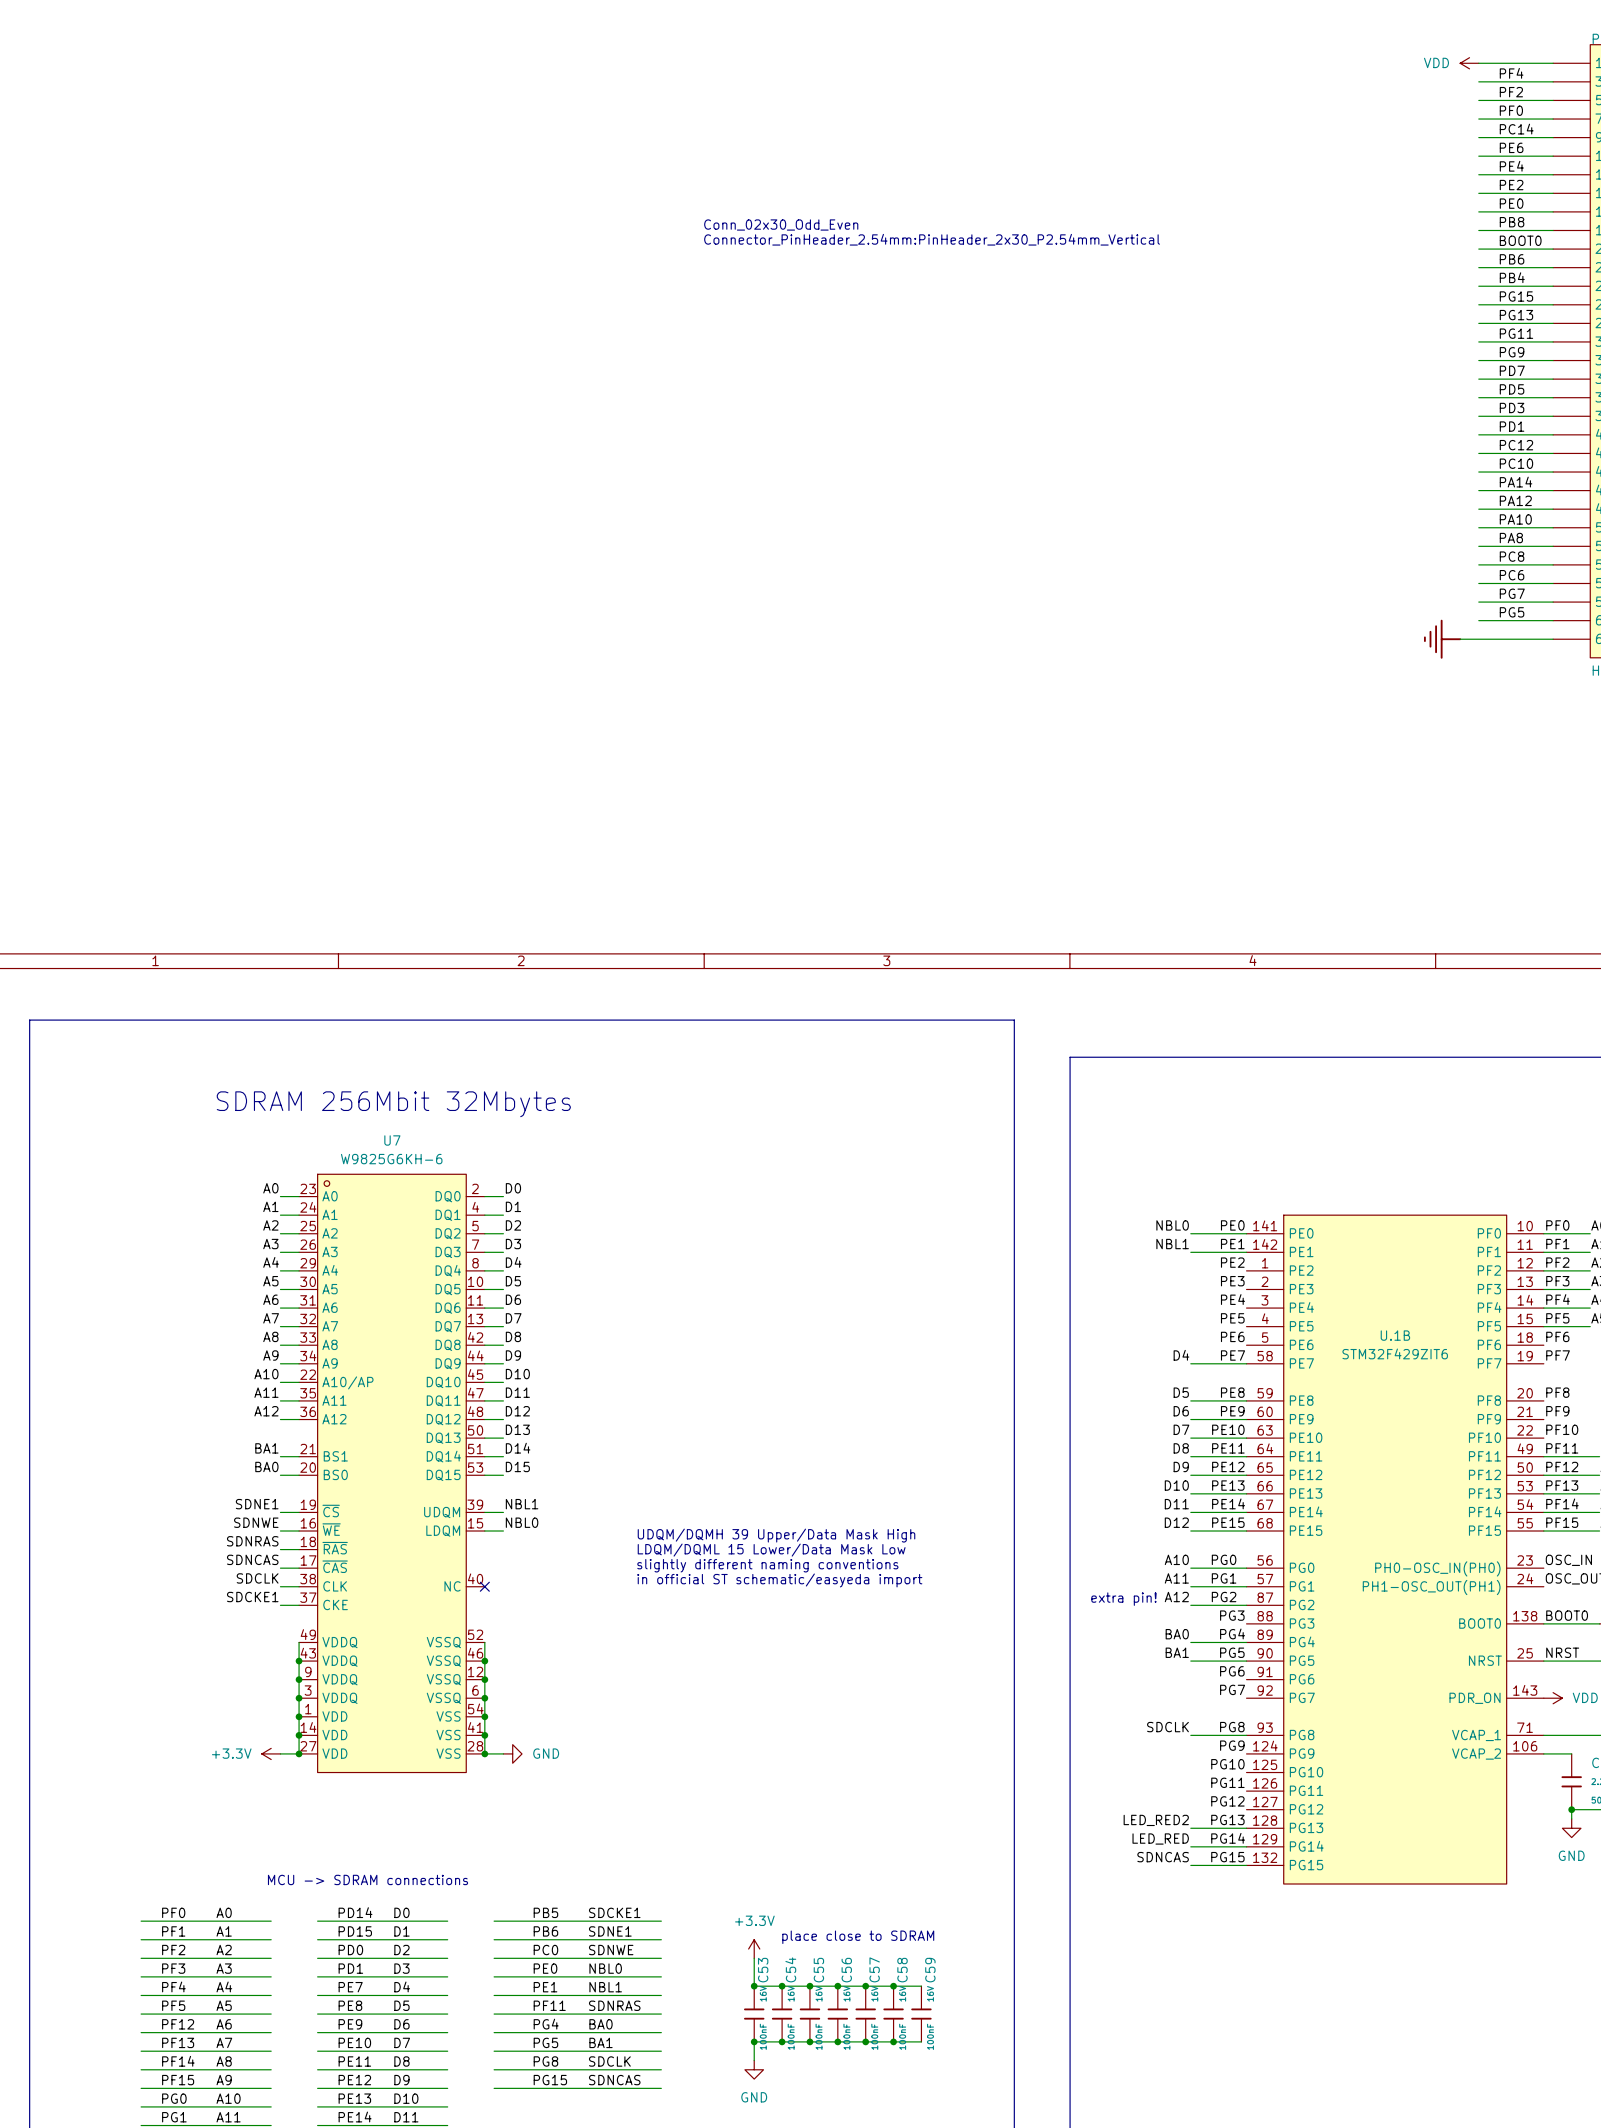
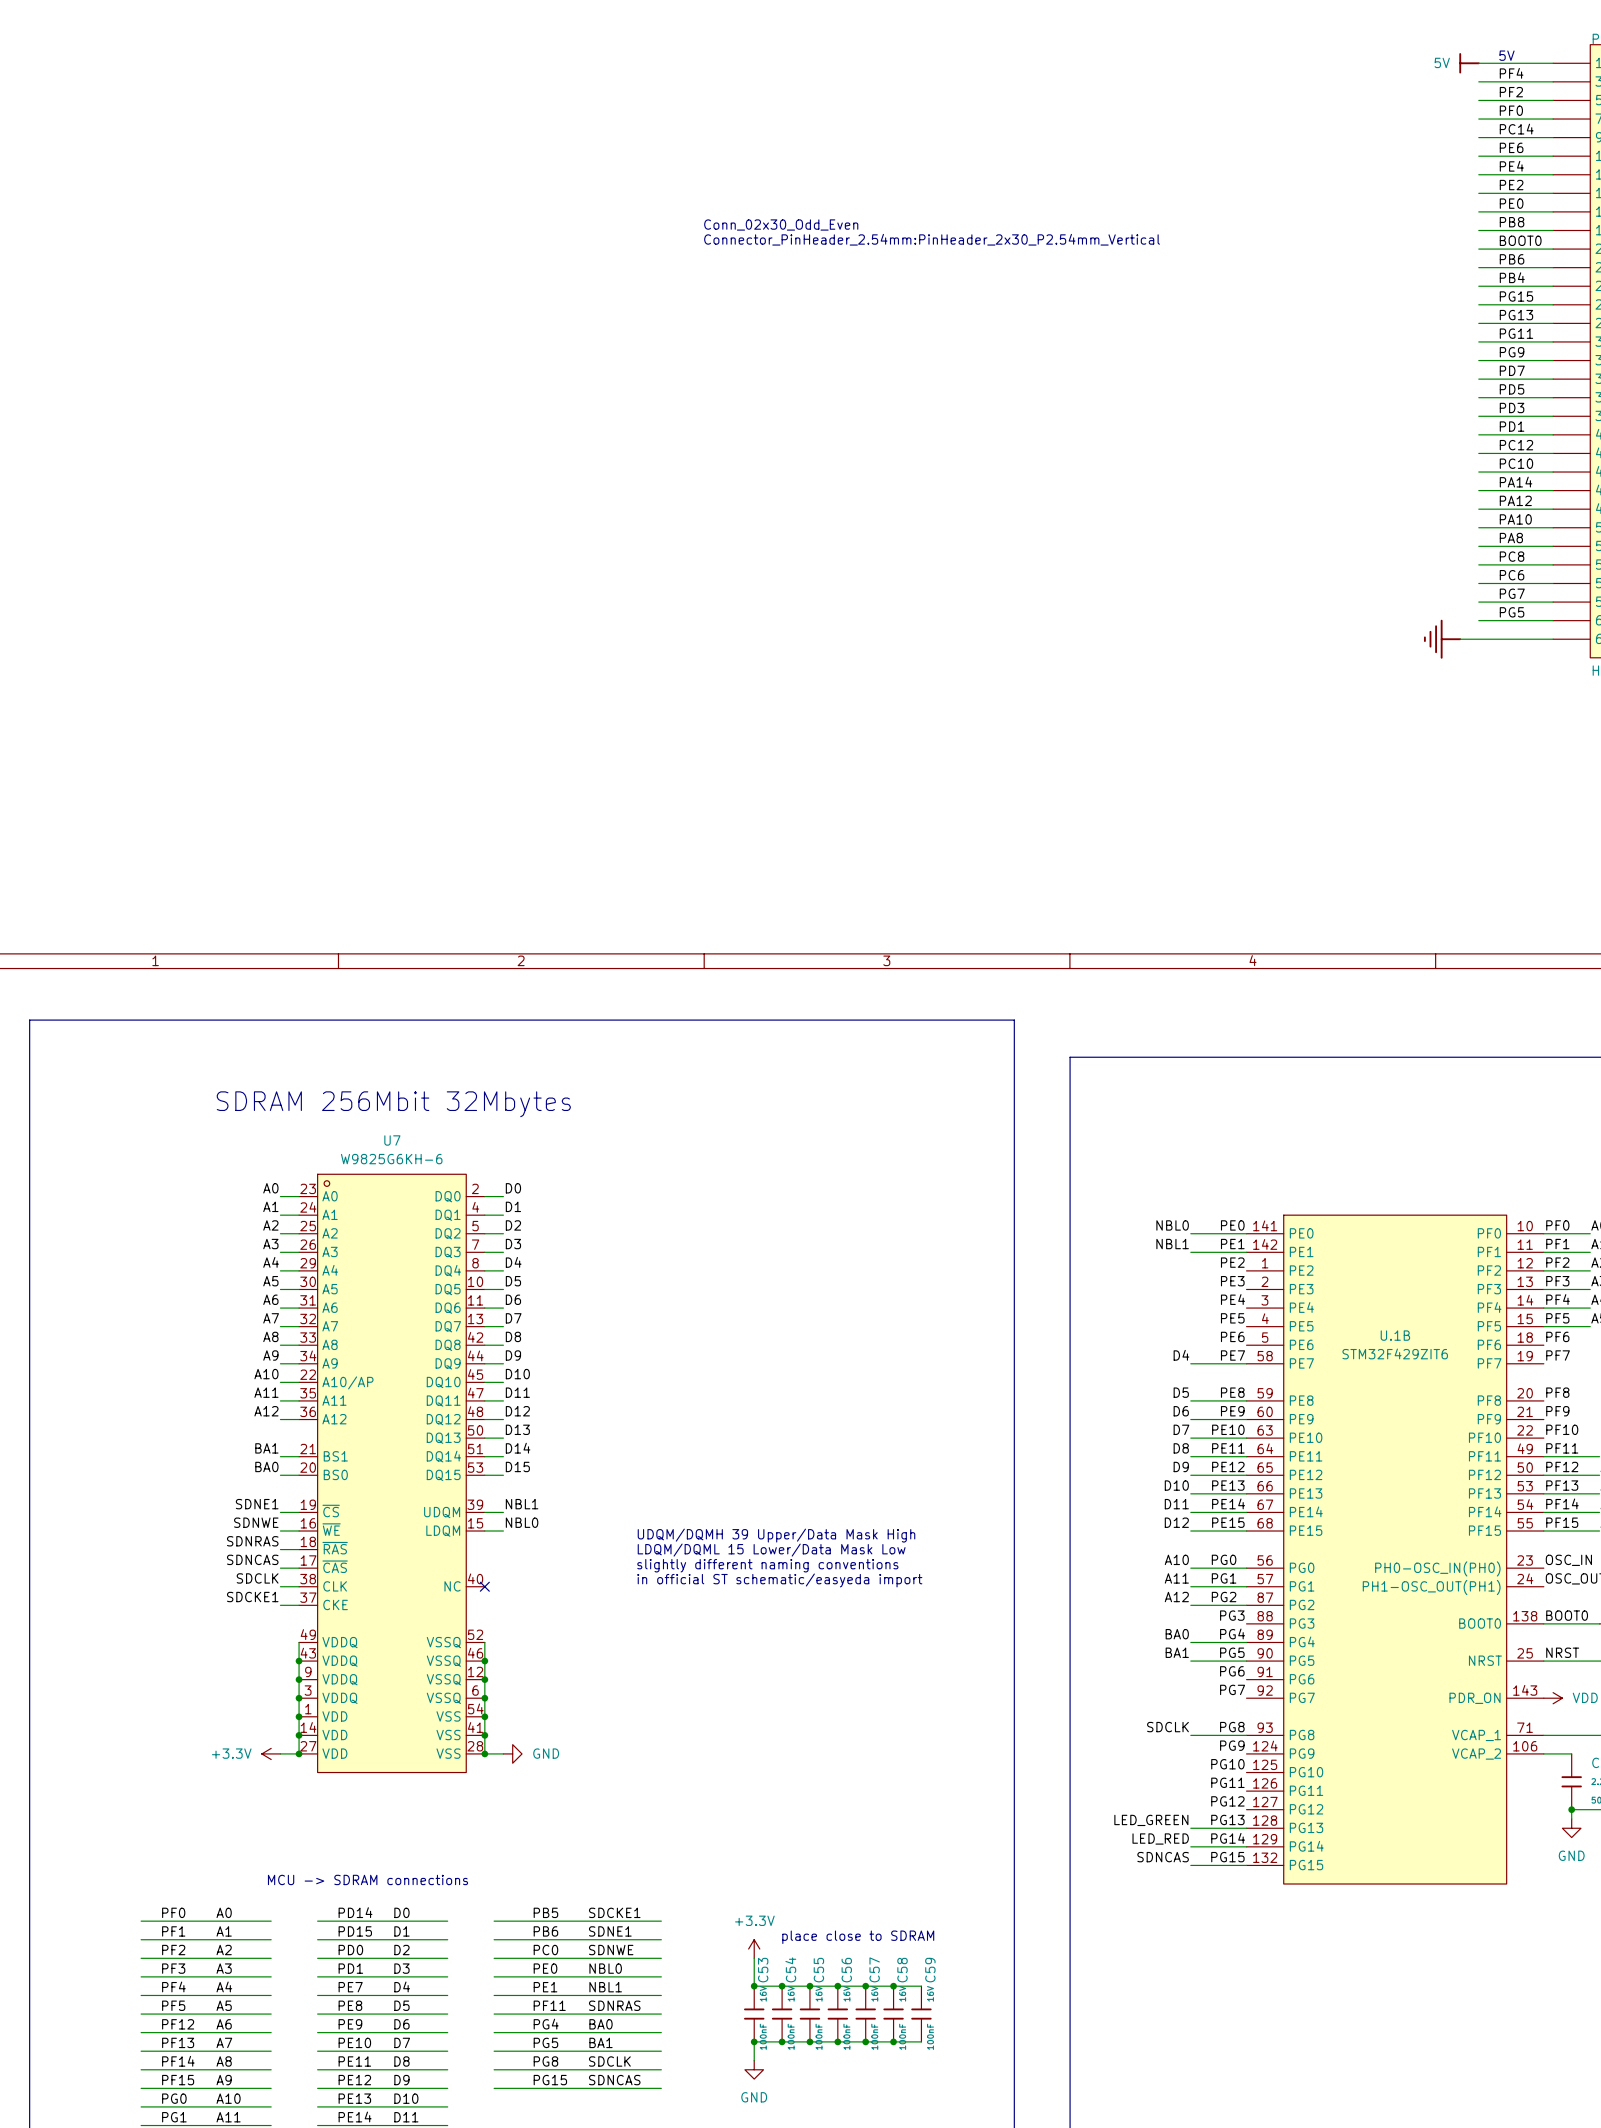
text: none -> 5V (1506, 55)
power symbol: VDD (1469, 63) -> 5V (1469, 63)
text: extra pin! (1123, 1599) -> none
label: LED_RED2 (1156, 1820) -> LED_GREEN (1151, 1820)

